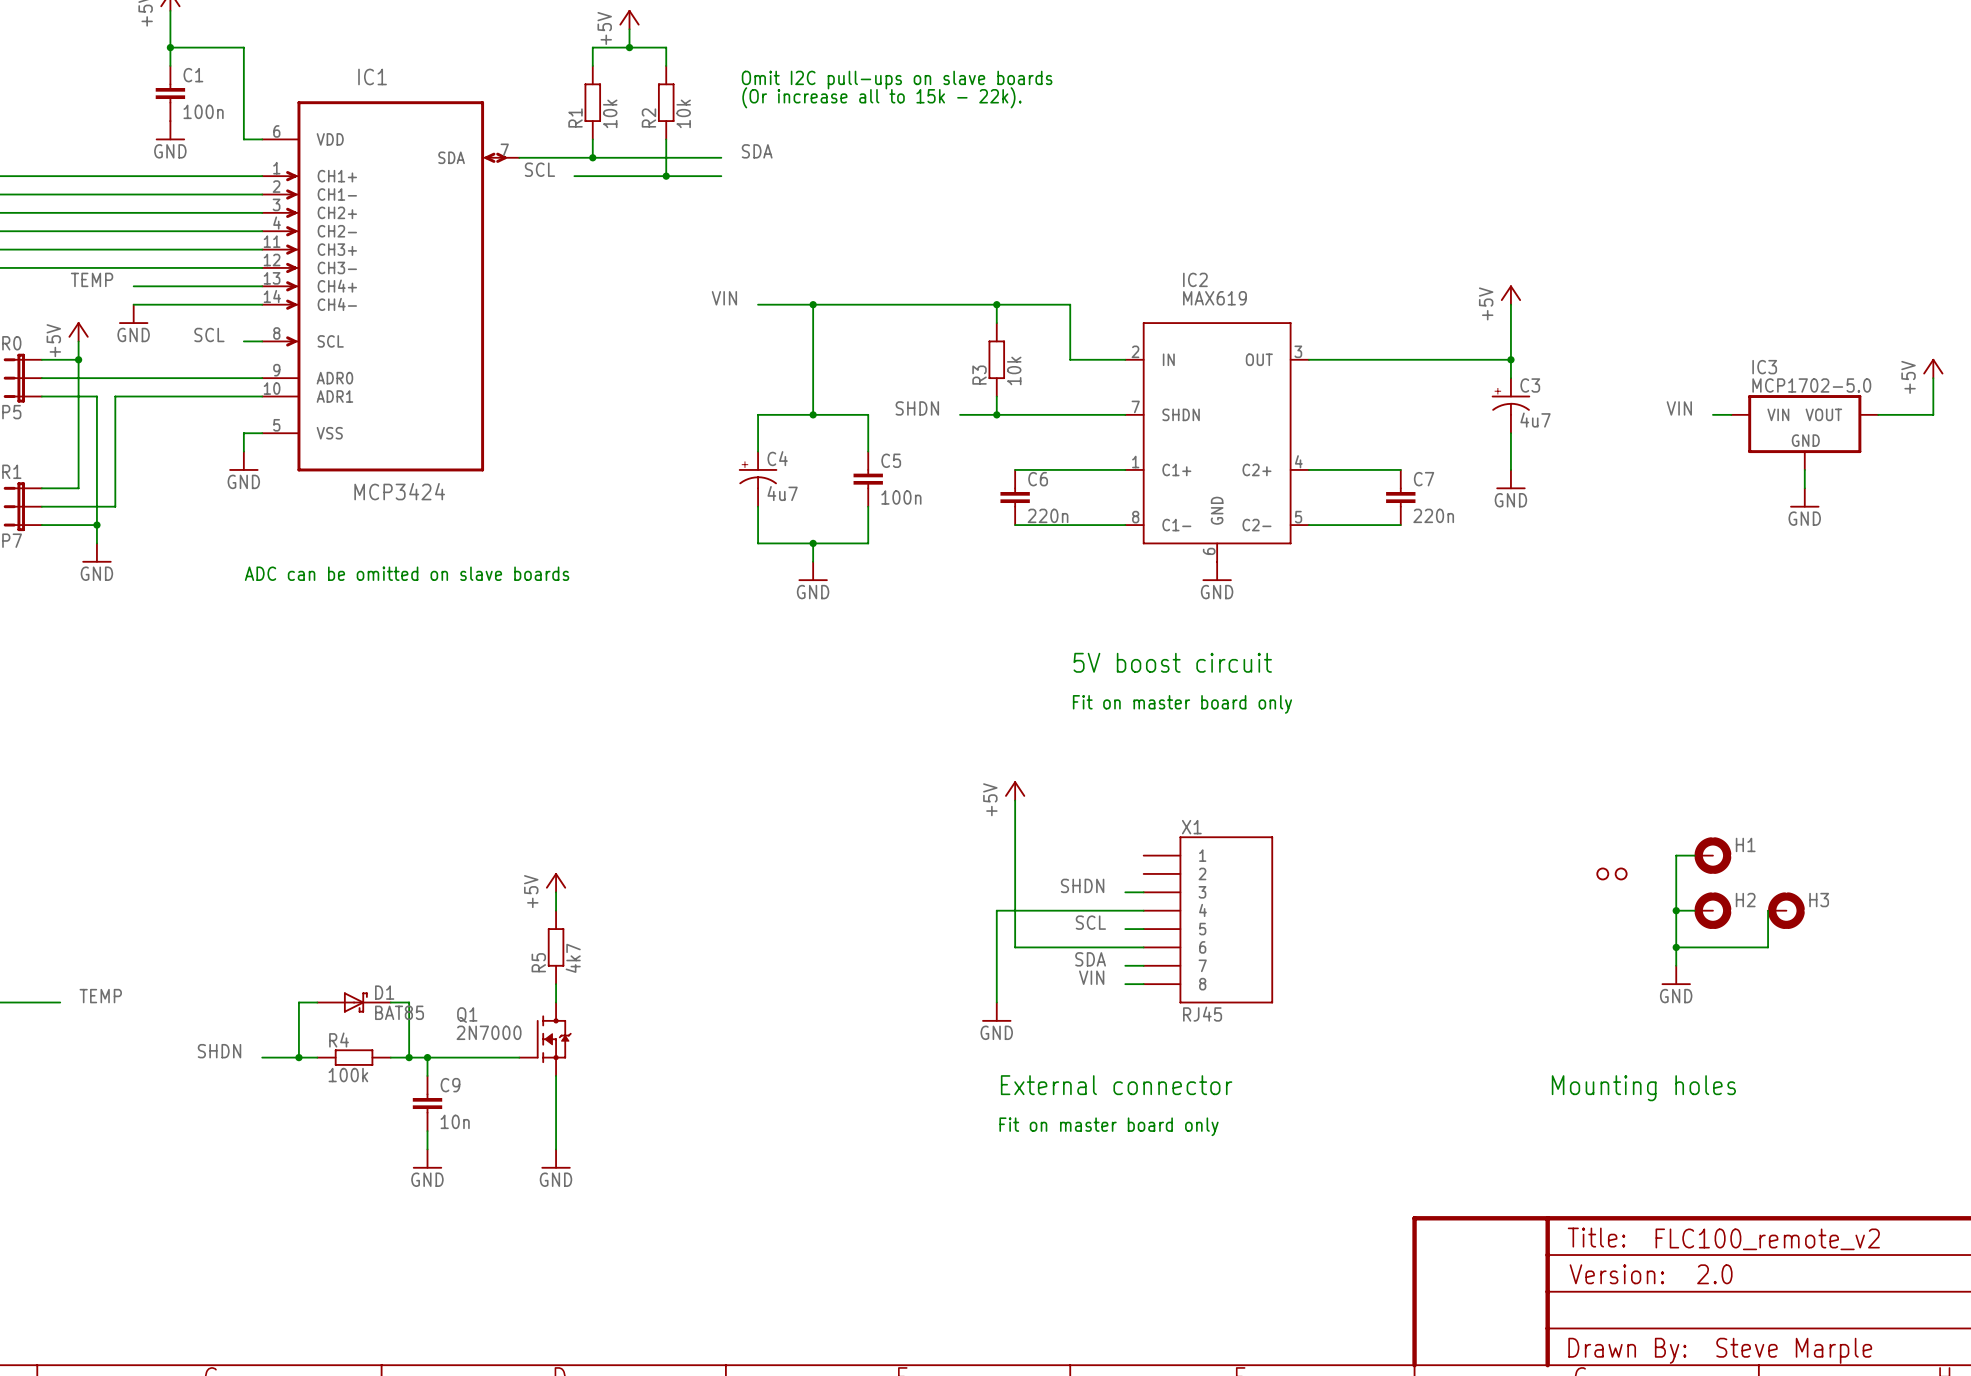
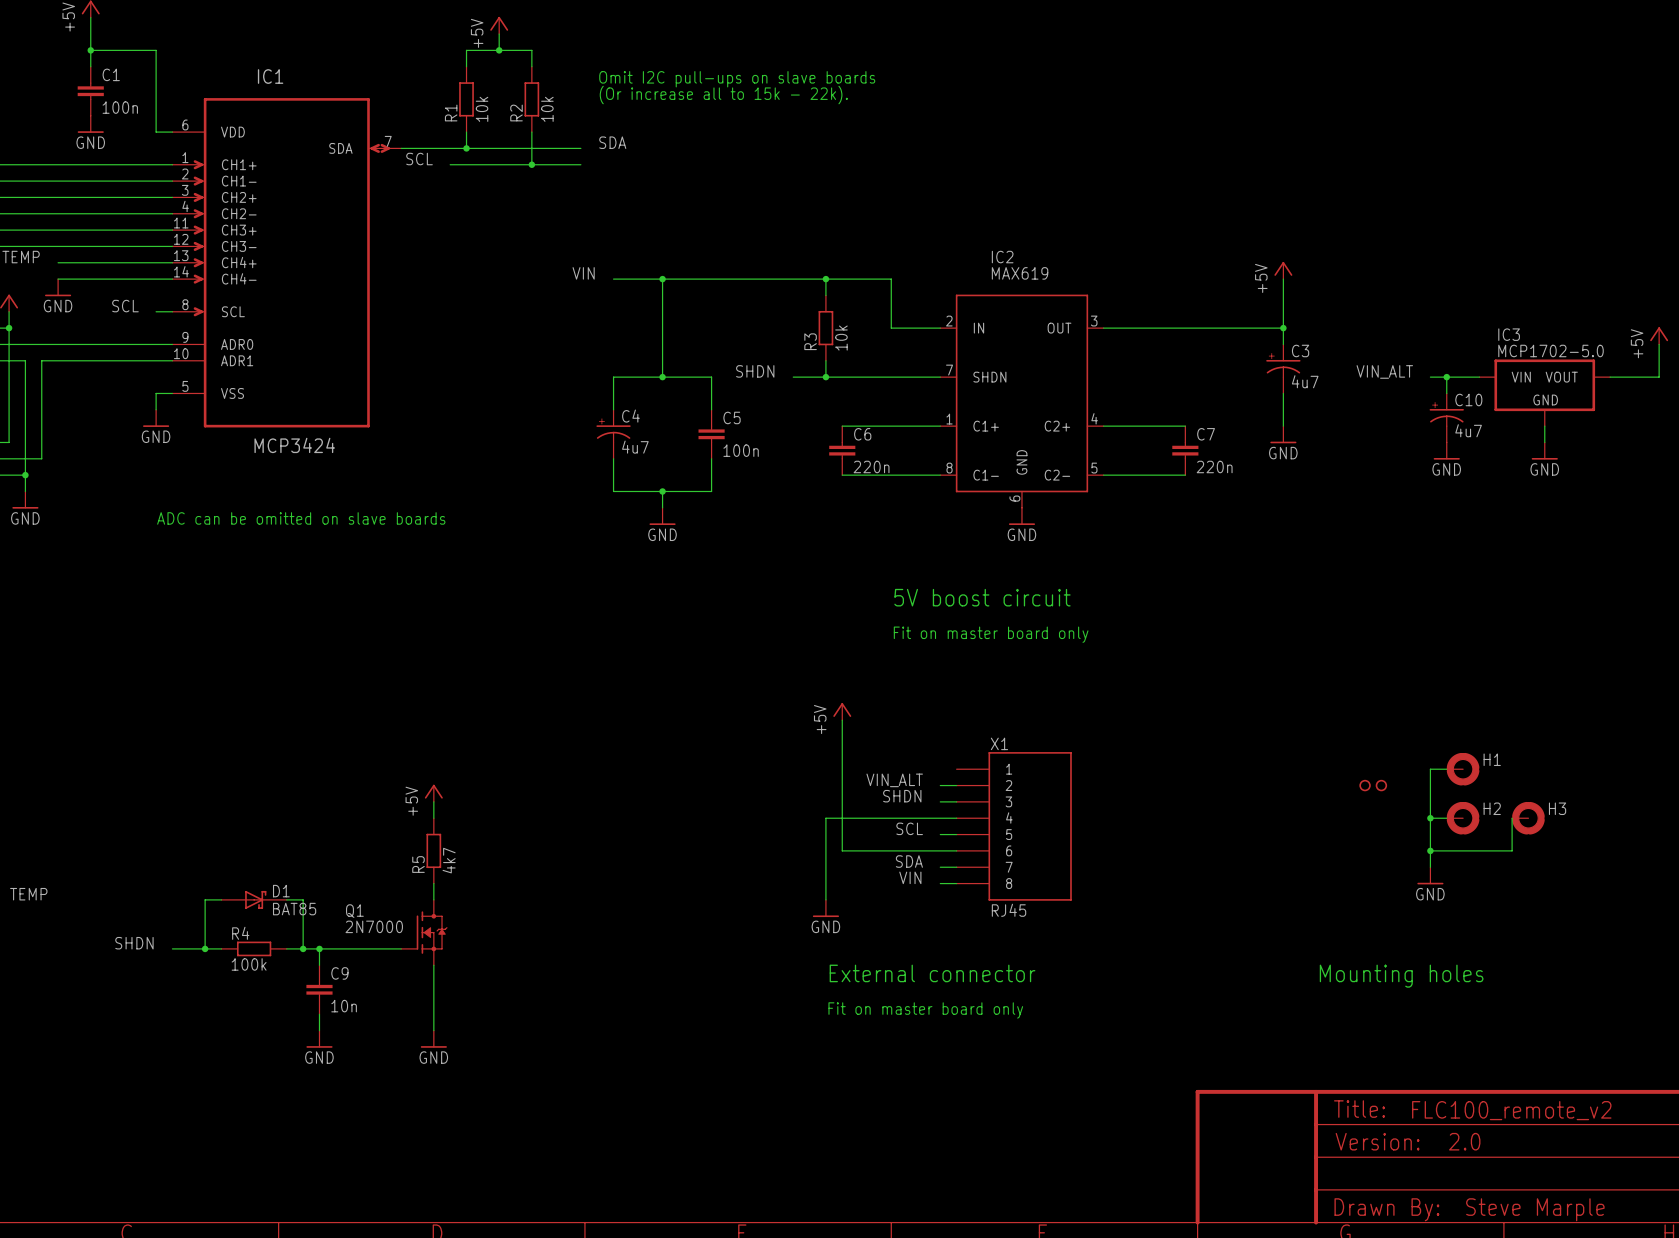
label: VIN (1679, 408) -> none
label: none -> VIN_ALT (1384, 371)
wire: none -> (1430, 377) (1463, 377)
wire: none -> (1446, 377) (1446, 393)
junction: none -> (1446, 377)
C10: none -> 4u7 (1446, 417)
power symbol: none -> GND (1446, 451)
label: none -> VIN_ALT (894, 780)
wire: none -> (940, 785) (956, 785)

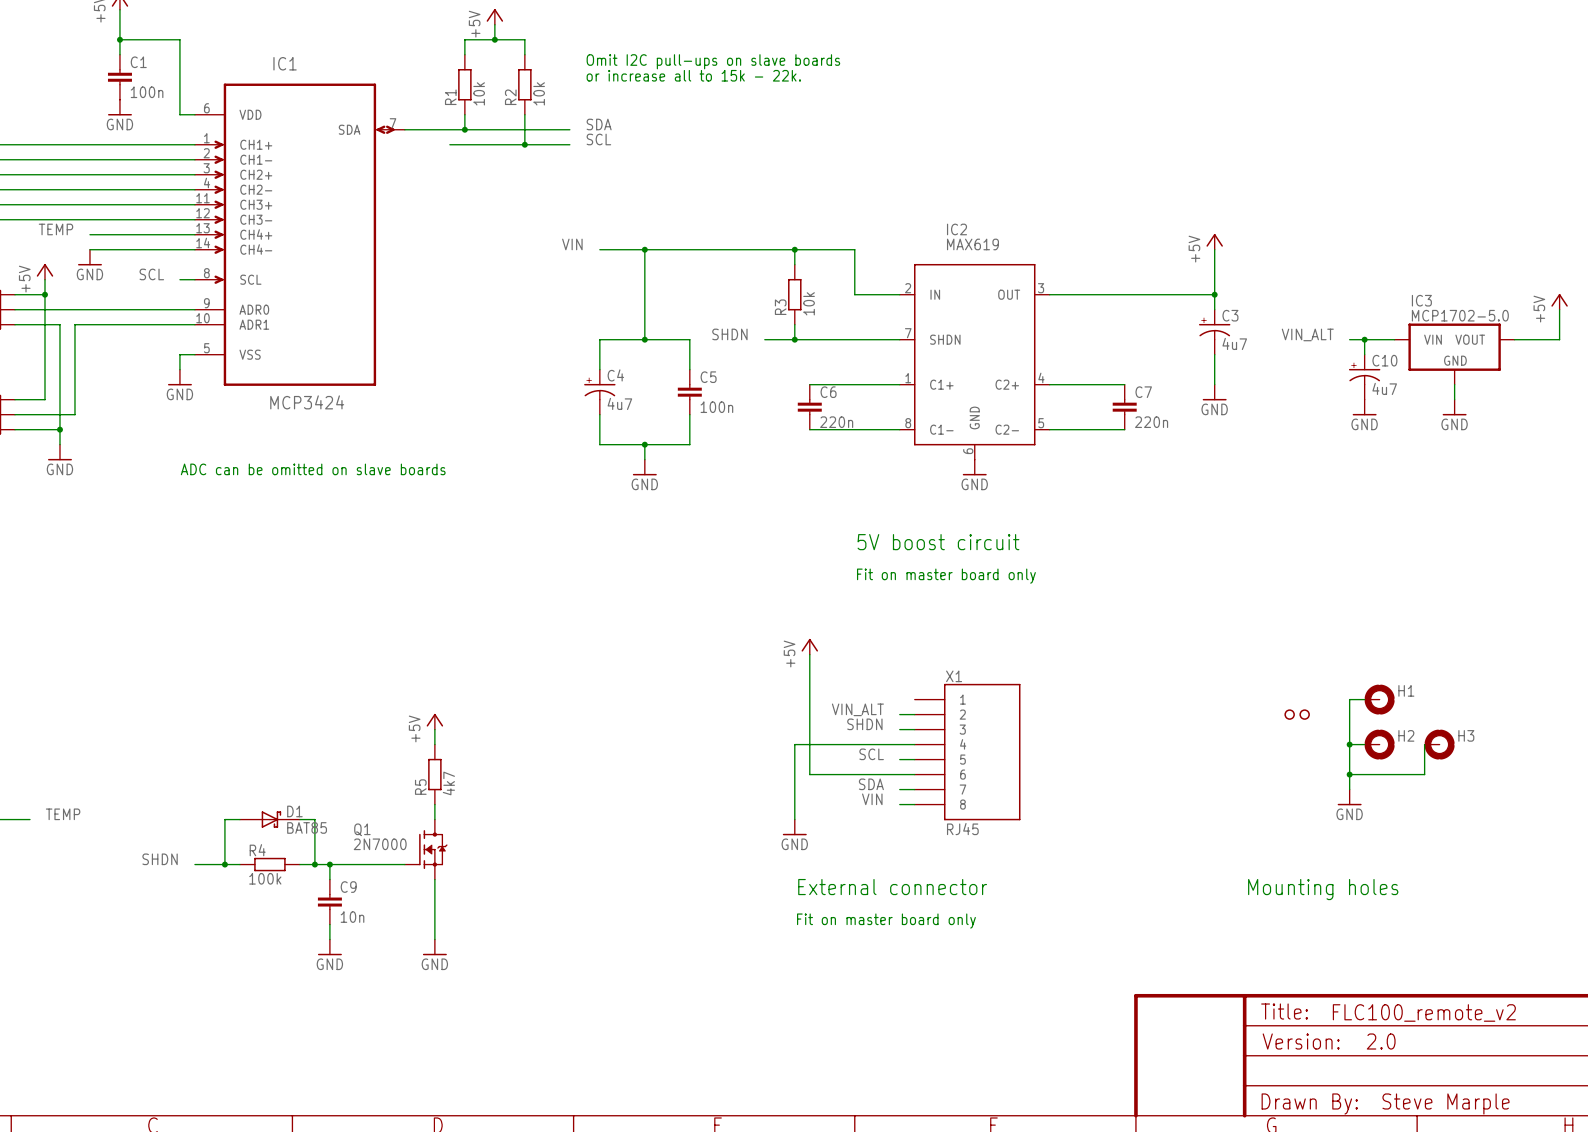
text: none -> Omit I2C pull-ups on slave boards (713, 61)
text: Omit I2C pull-ups on slave boards (737, 79) -> or increase all to 15k - 22k. (693, 75)
text: (Or increase all to 15k - 22k). (723, 95) -> none
label: SCL (419, 159) -> none
label: none -> SCL (598, 139)

